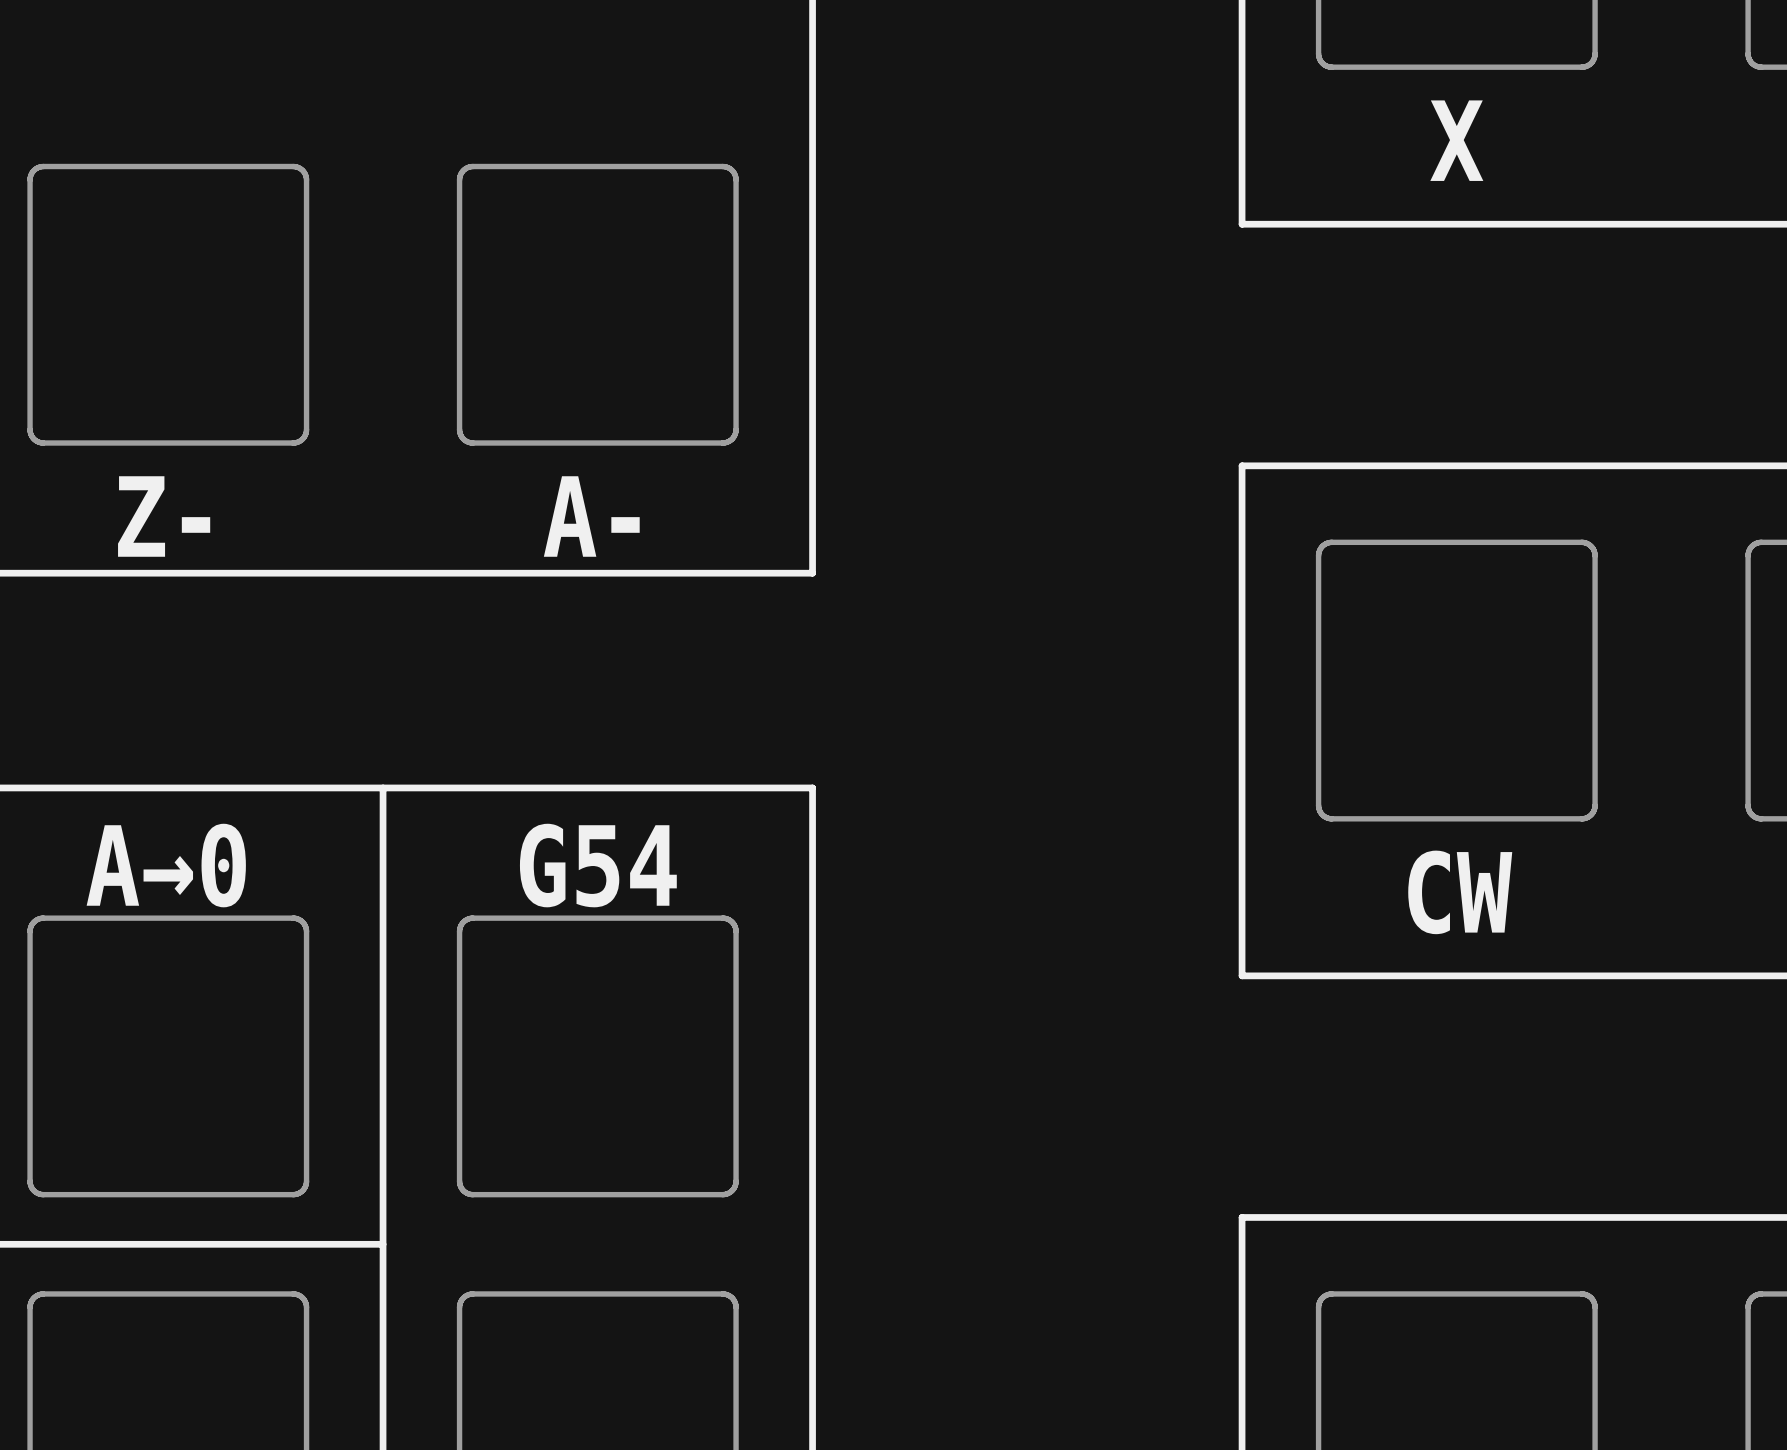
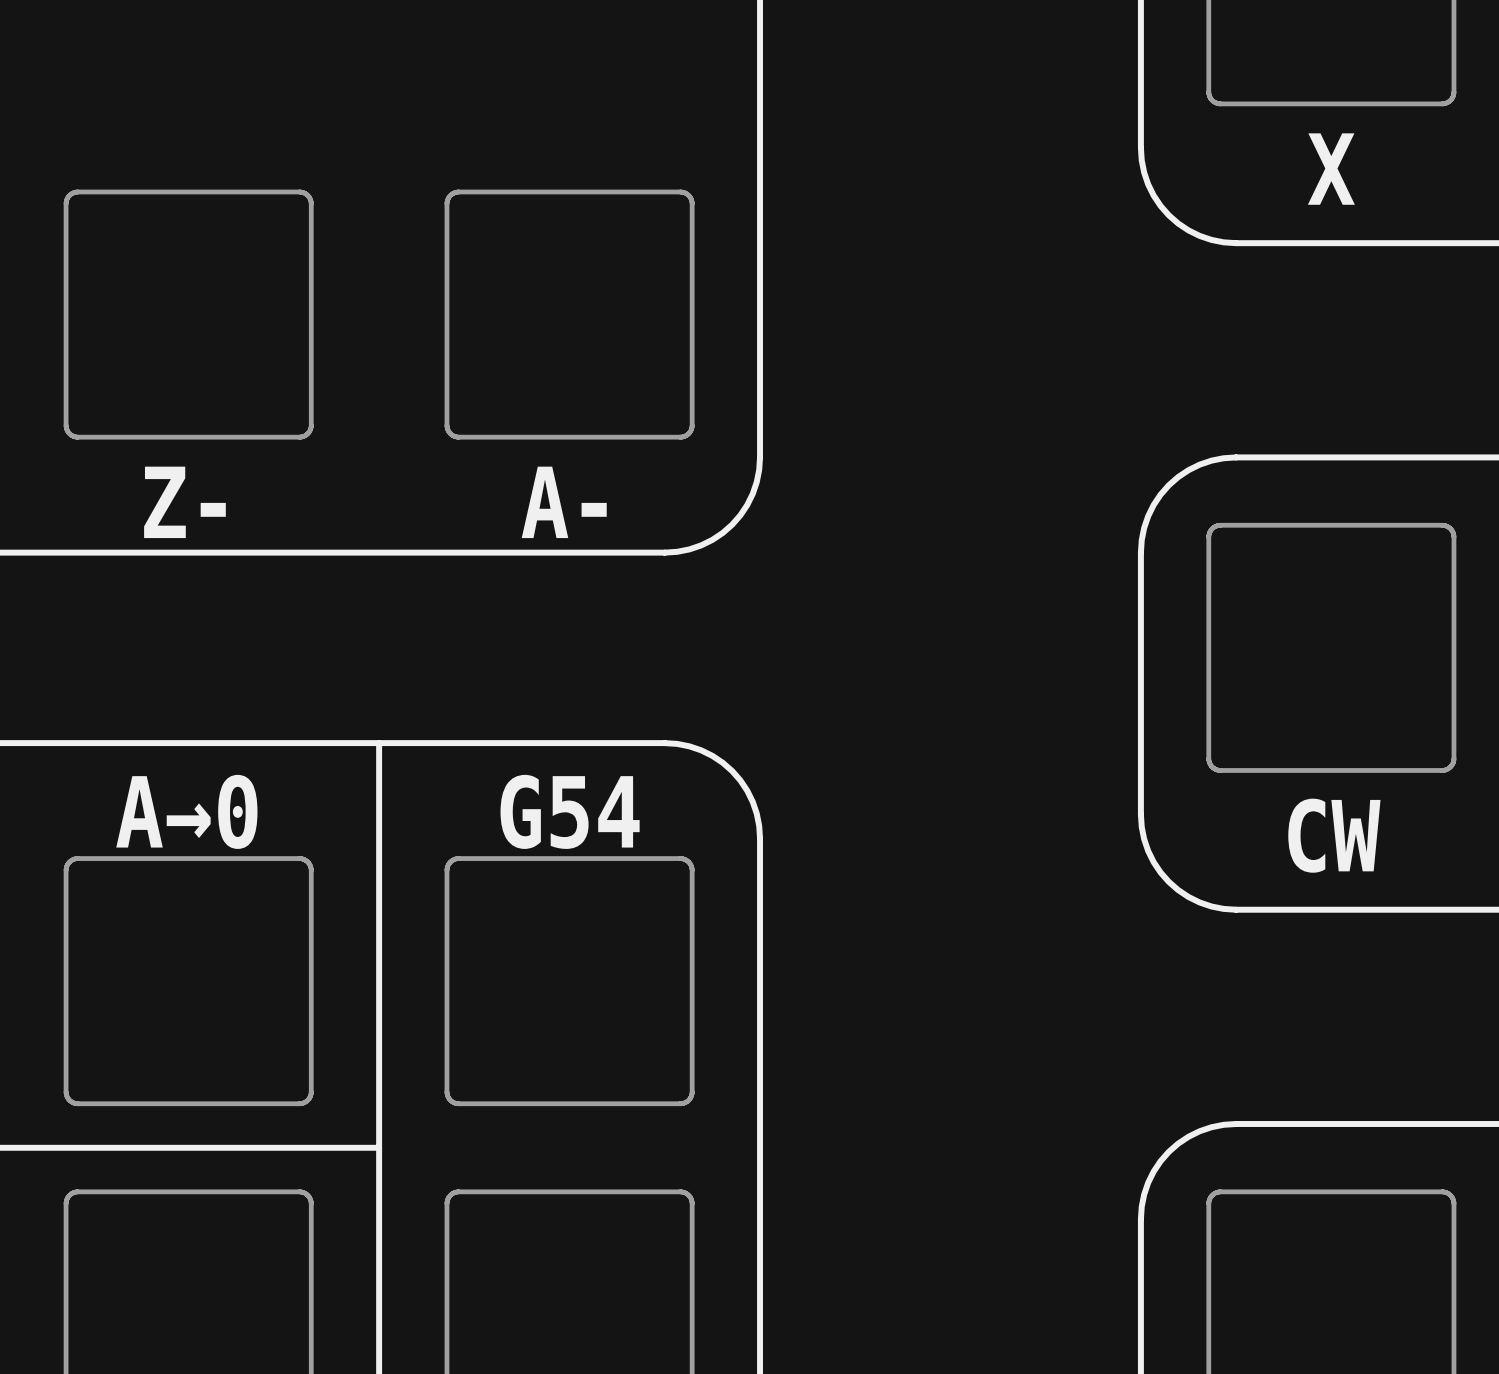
line: (1242, 116) (1242, 224) (1349, 224) -> (1140, 147) (1144, 172) (1148, 184) (1153, 195) (1168, 215) (1178, 223) (1199, 235) (1211, 239) (1236, 243)
line: (812, 465) (812, 573) (705, 573) -> (760, 457) (759, 469) (752, 493) (740, 515) (732, 524) (722, 532) (701, 545) (689, 549) (664, 552)
line: (1349, 465) (1242, 465) (1242, 573) -> (1236, 457) (1223, 458) (1199, 464) (1188, 470) (1168, 485) (1153, 505) (1148, 516) (1144, 527) (1140, 552)
line: (705, 787) (812, 787) (812, 895) -> (664, 743) (689, 746) (701, 750) (722, 762) (732, 770) (740, 780) (752, 801) (756, 813) (760, 838)
line: (1242, 868) (1242, 975) (1349, 975) -> (1140, 814) (1141, 826) (1148, 850) (1153, 862) (1168, 881) (1178, 890) (1199, 902) (1211, 906) (1236, 909)
line: (1349, 1217) (1242, 1217) (1242, 1324) -> (1236, 1123) (1223, 1124) (1199, 1131) (1188, 1136) (1168, 1151) (1160, 1161) (1148, 1182) (1144, 1194) (1140, 1219)

